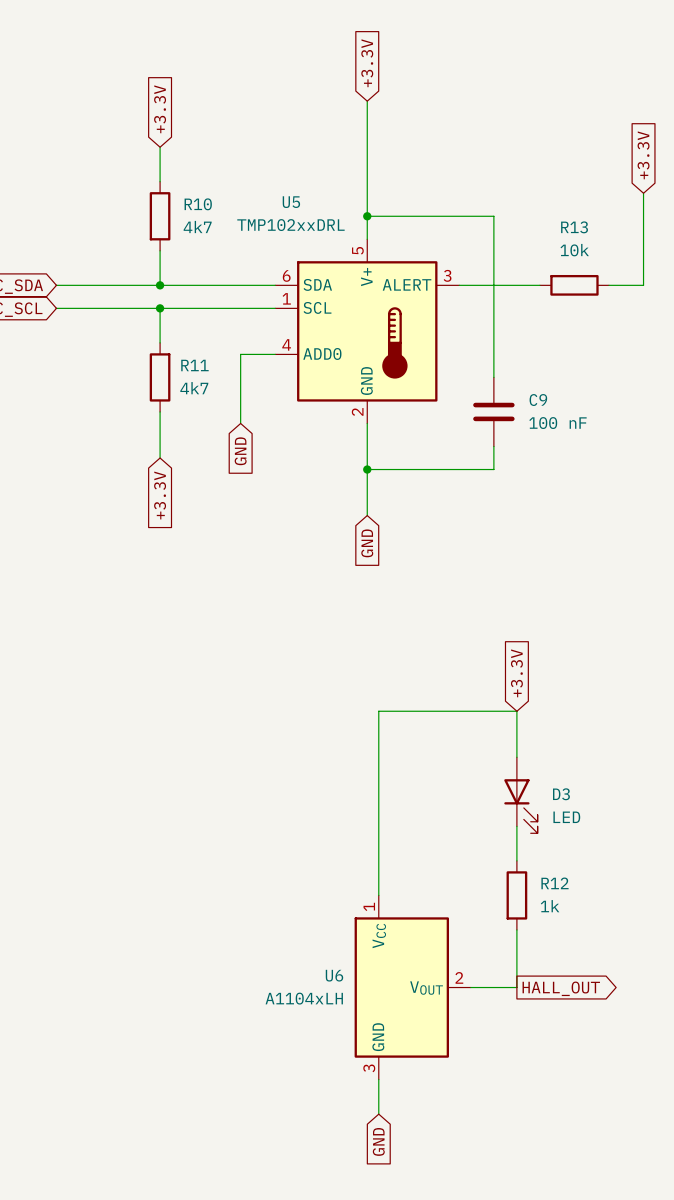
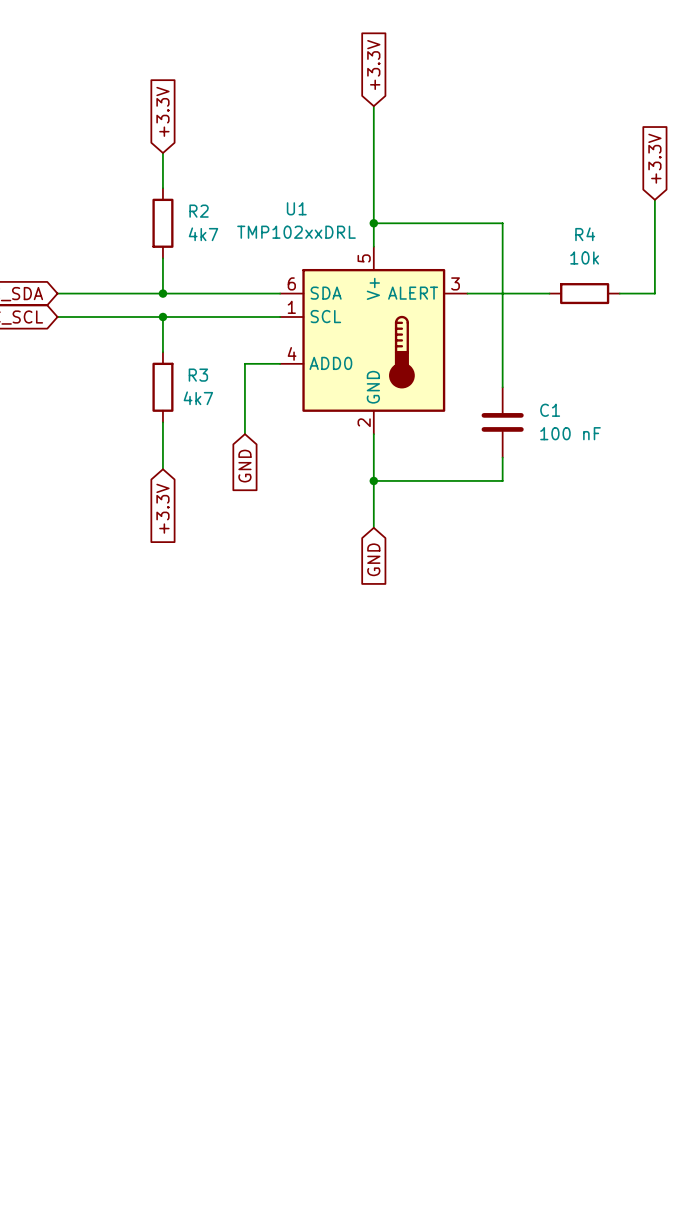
U5 name: U5 (291, 202) -> U1 (296, 208)
R10 name: R10 (198, 204) -> R2 (199, 211)
R13 name: R13 (574, 227) -> R4 (585, 234)
R11 name: R11 (194, 365) -> R3 (198, 375)
C9 name: C9 (538, 400) -> C1 (550, 410)
global label: +3.3V (516, 673) -> none
wire: (516, 757) (516, 711) (378, 711) (378, 895) -> none
D3: LED (520, 795) -> none
wire: (516, 826) (516, 860) -> none
R12: 1k (516, 895) -> none
wire: (516, 929) (516, 987) (470, 987) -> none
U6: A1104xLH (412, 987) -> none
global label: HALL_OUT (561, 988) -> none
wire: (378, 1079) (378, 1114) -> none
global label: GND (378, 1141) -> none

